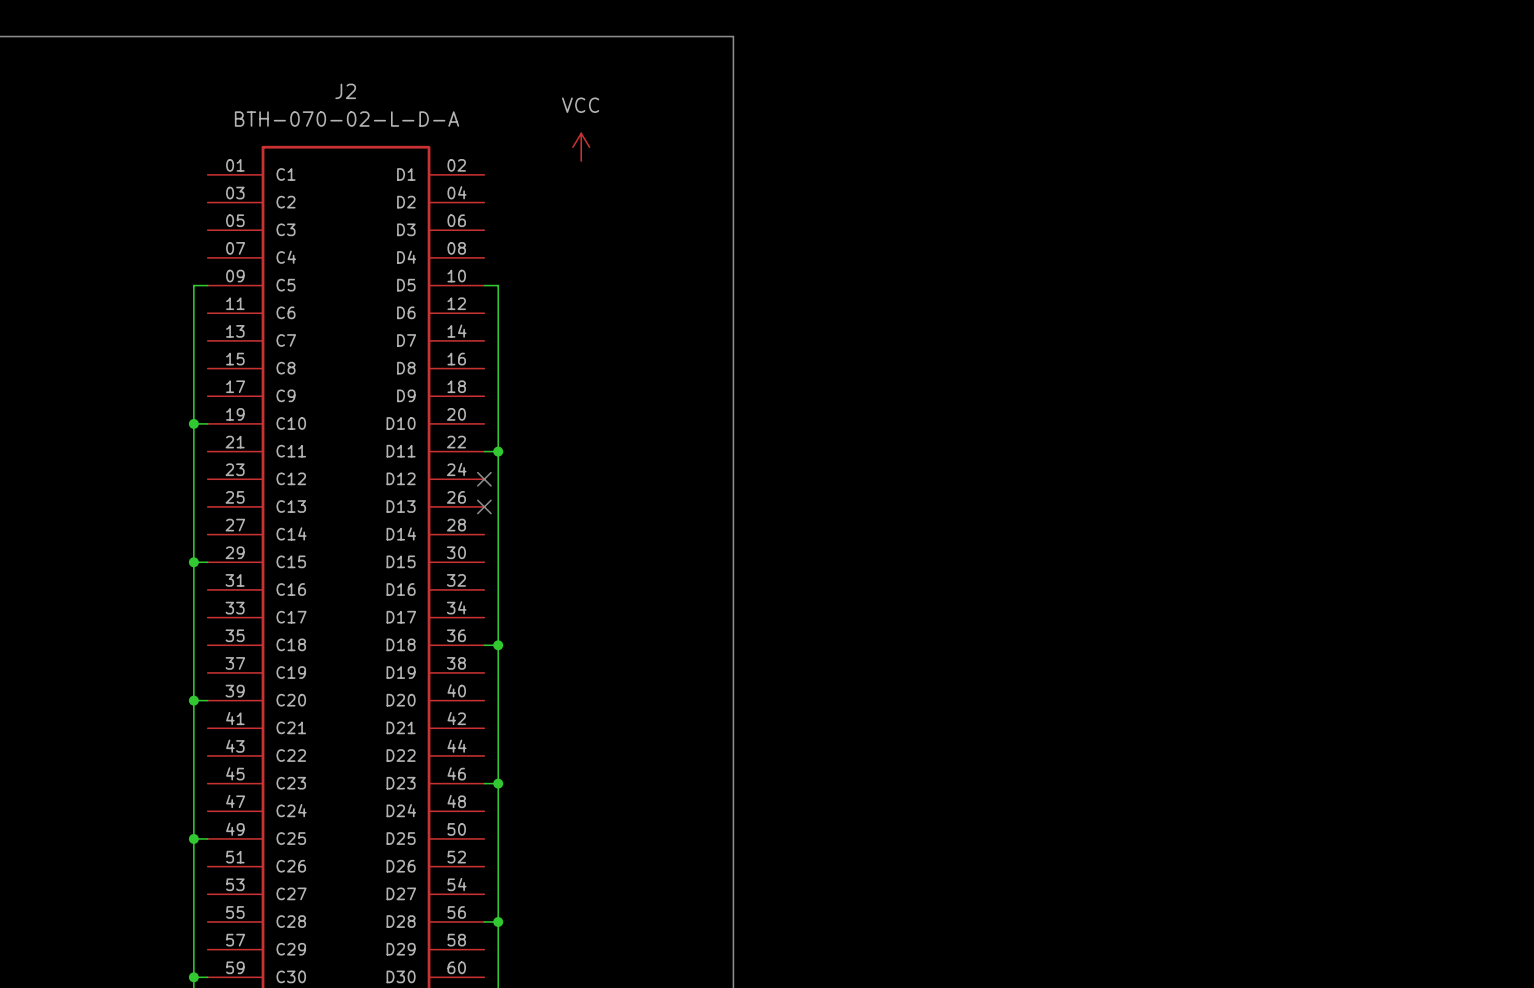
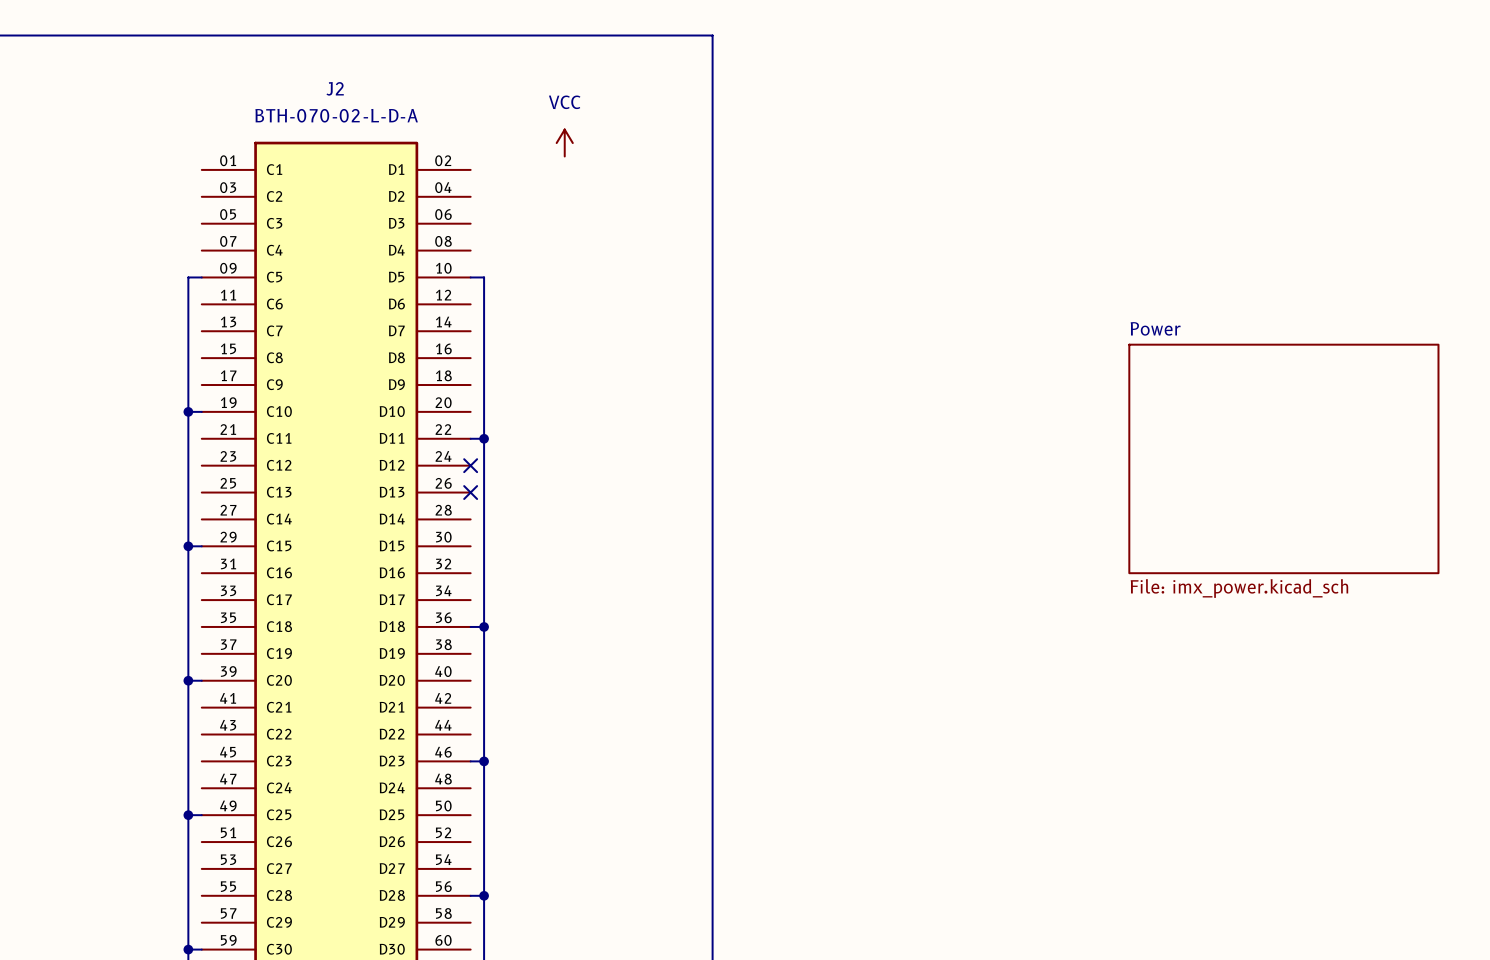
sheet Power: none -> File: imx_power.kicad_sch (1283, 458)

